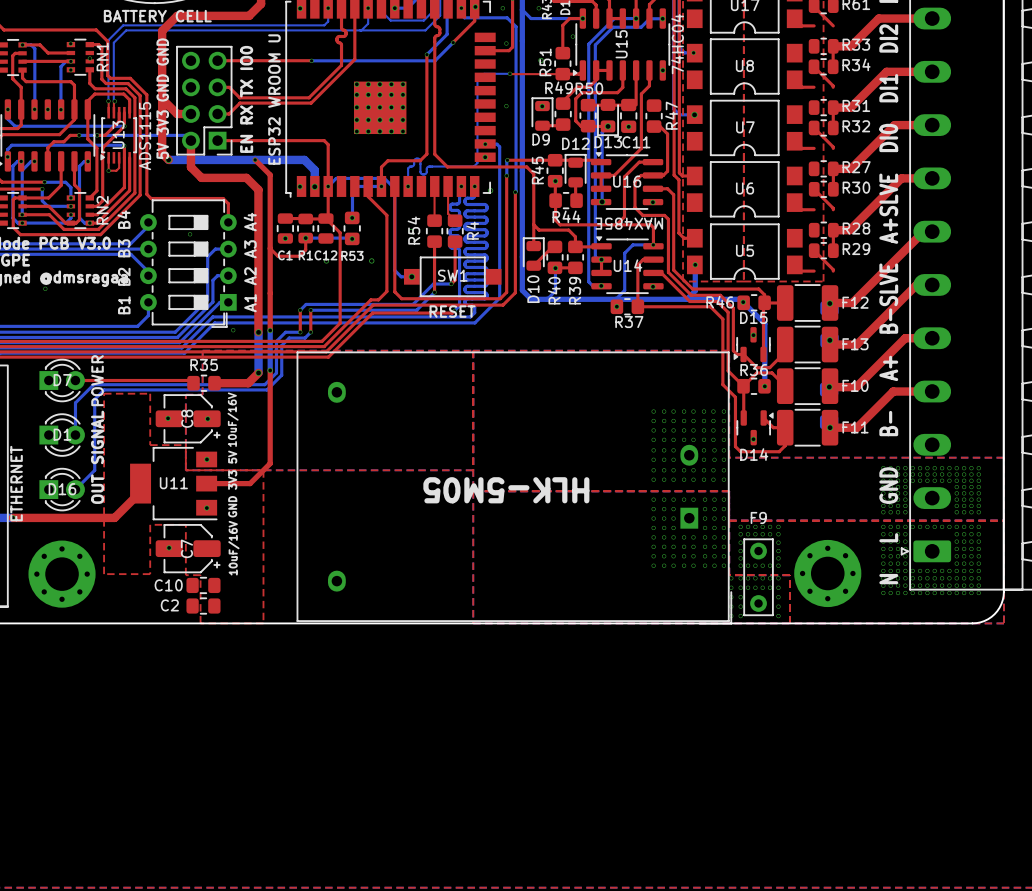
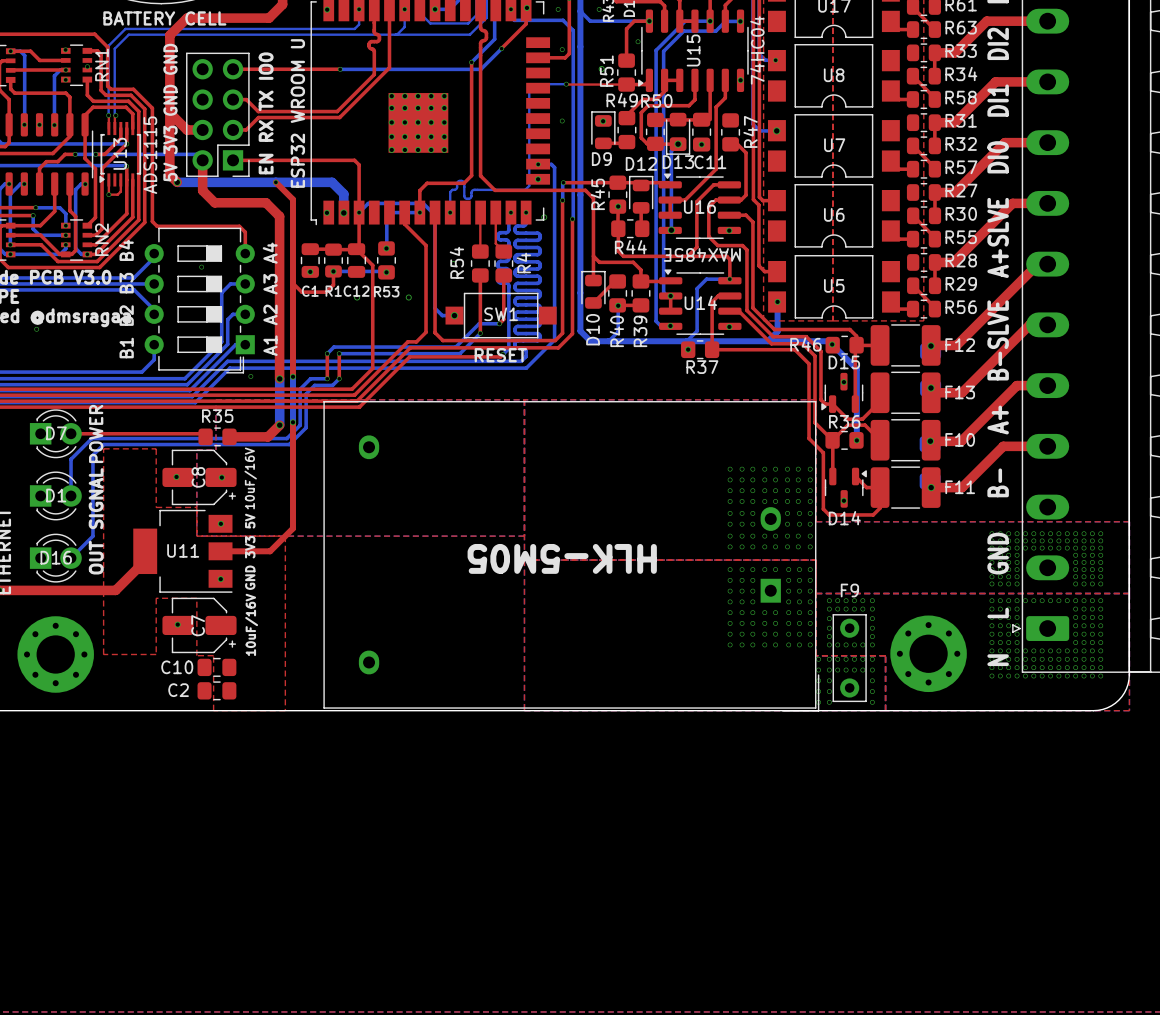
R63: none -> (923, 29)
R58: none -> (923, 99)
R57: none -> (923, 169)
R55: none -> (923, 239)
R56: none -> (923, 309)

